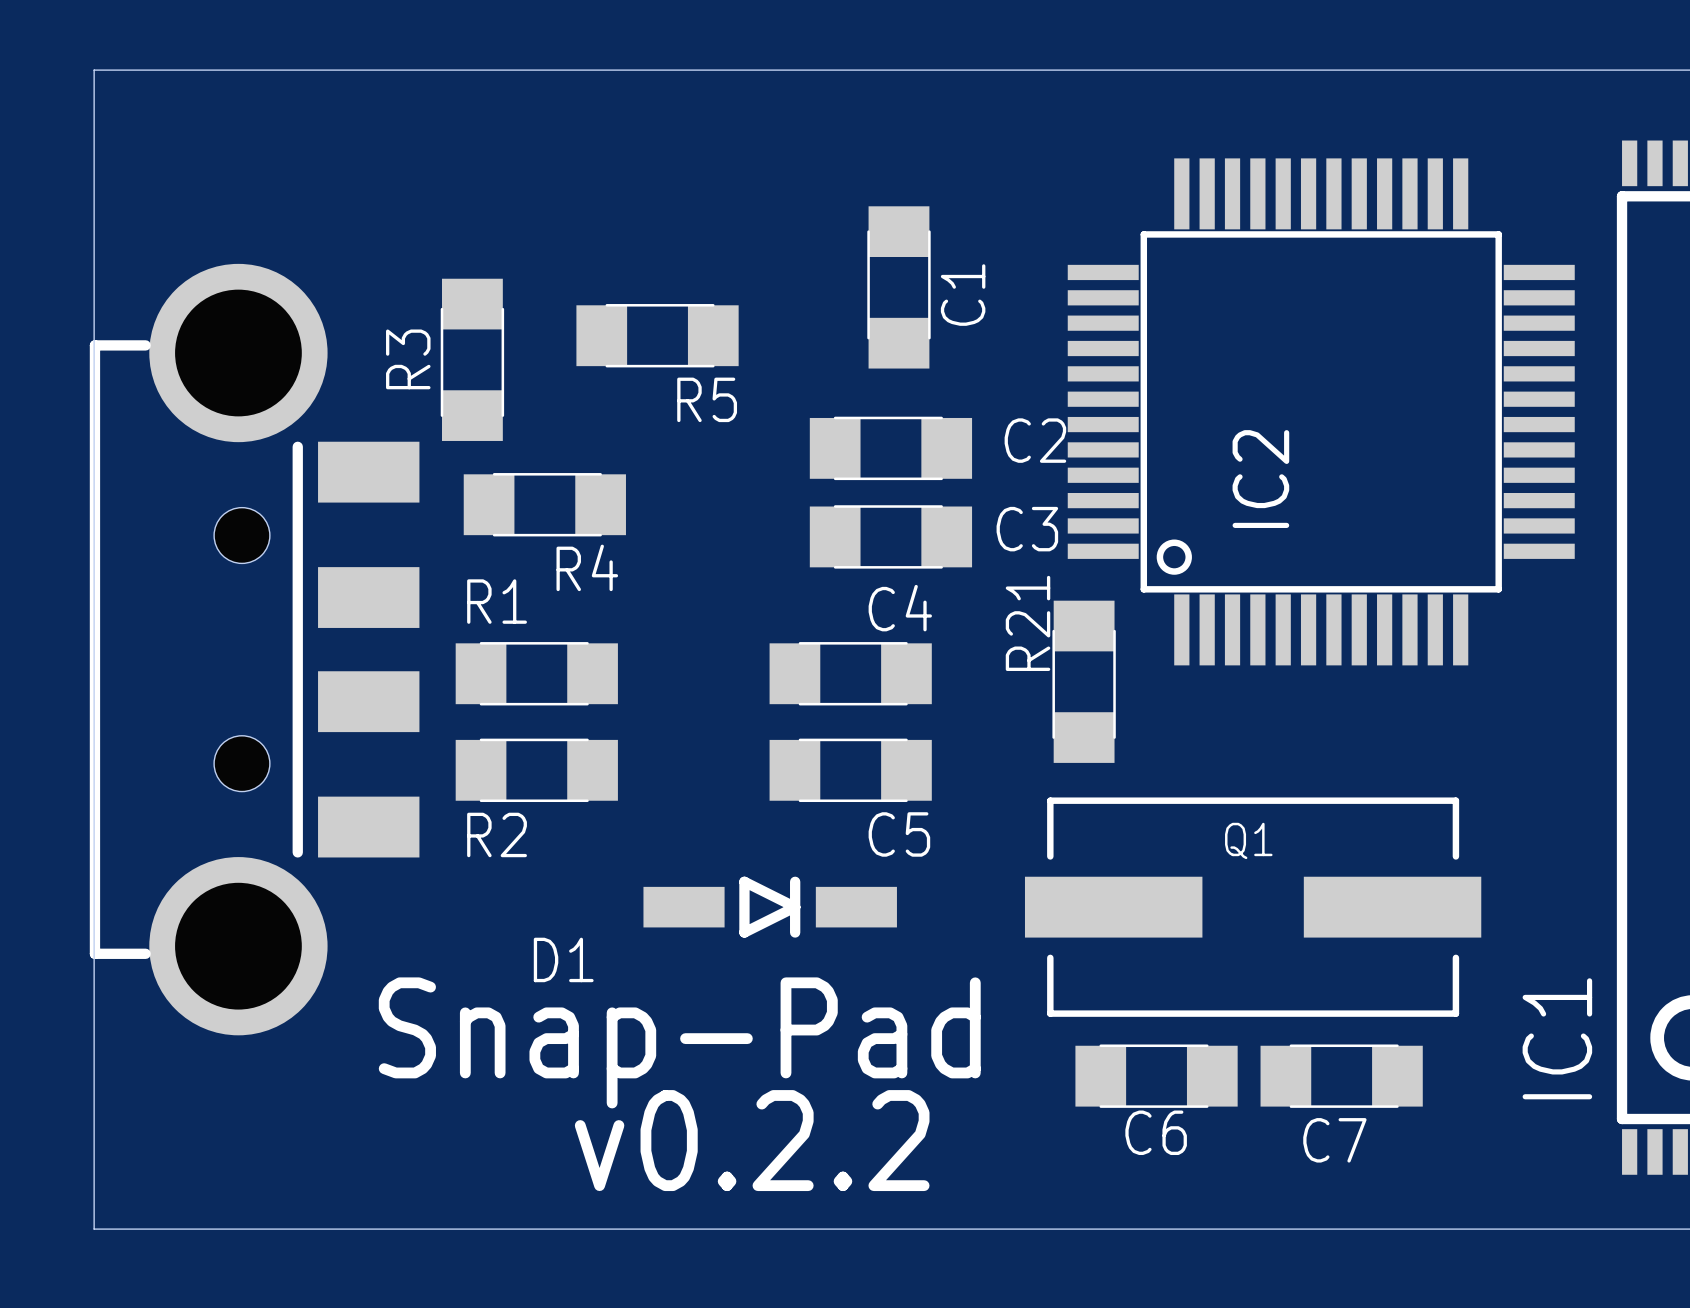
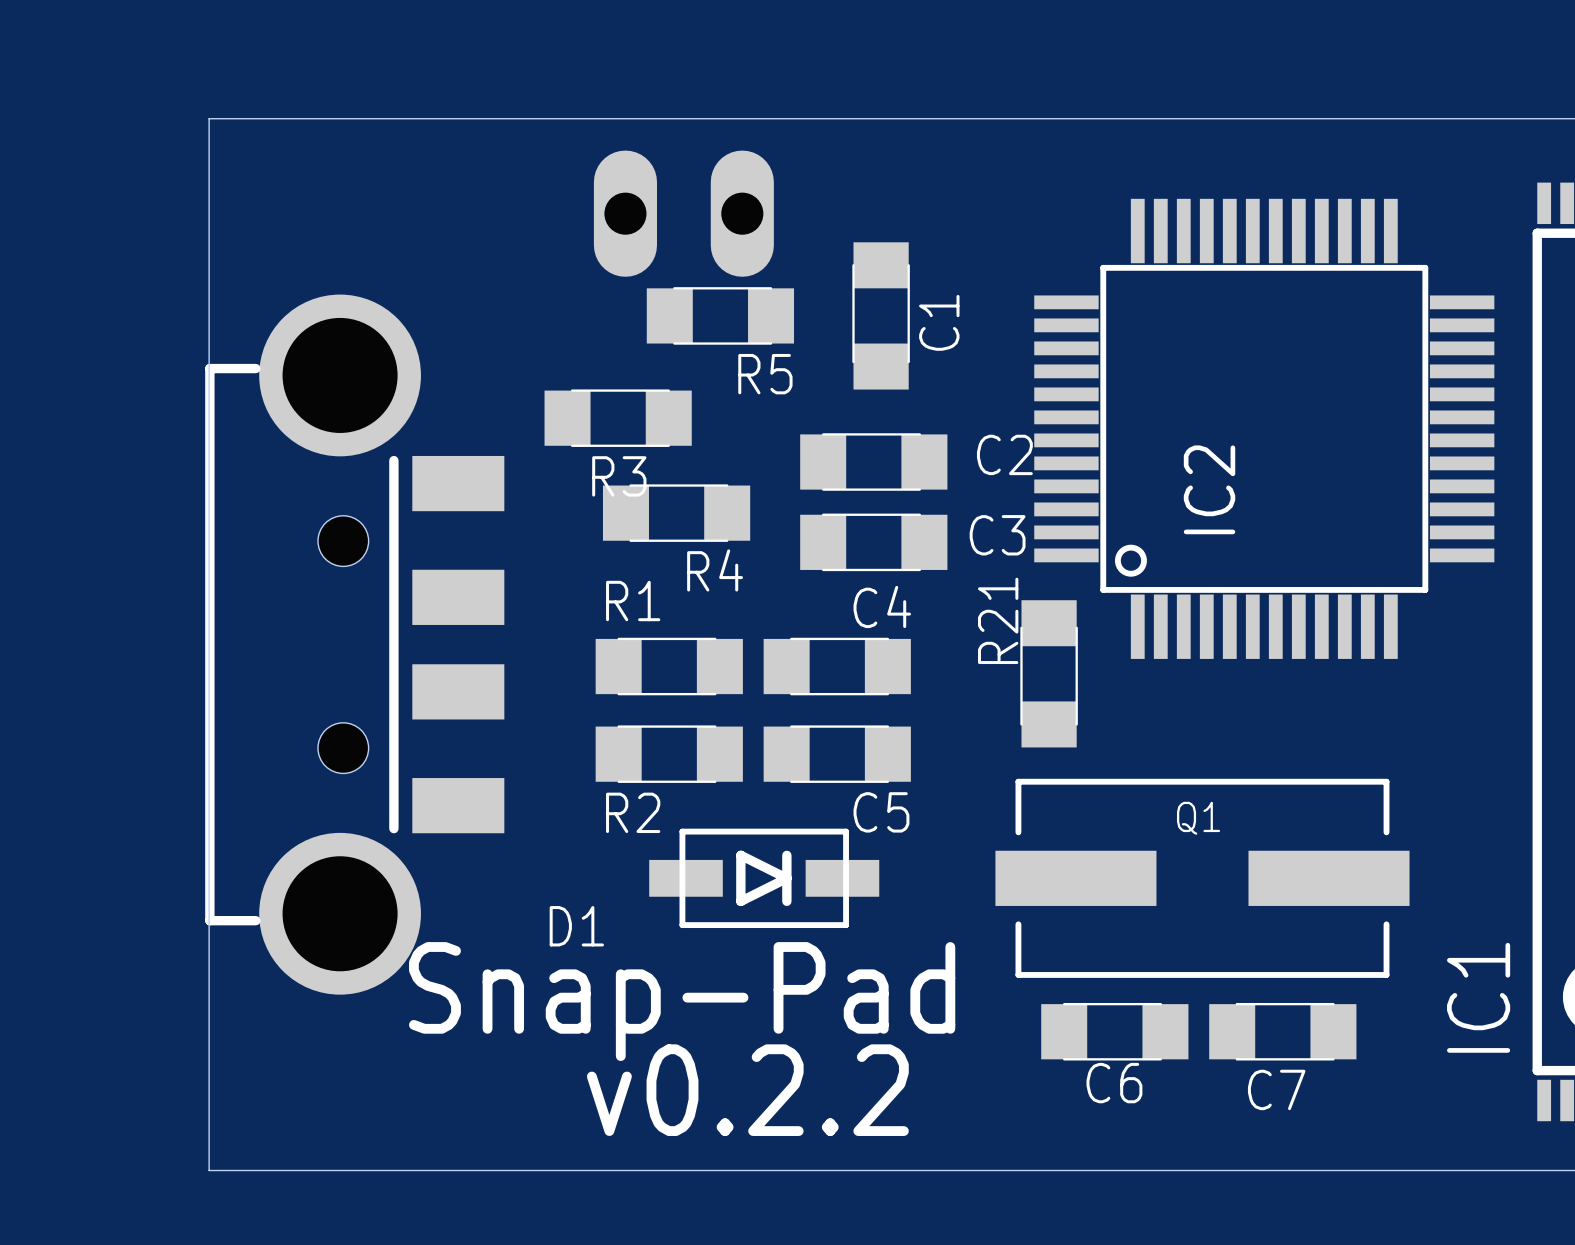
board edge: (158, 70) (94, 70) (94, 1229) (158, 1229) -> (209, 118) (209, 1170)
part: none -> (683, 213)
R5 position: (657, 335) -> (720, 315)
R3 rotation: 0° (472, 359) -> 90° counterclockwise (618, 418)
R3 position: (472, 359) -> (618, 418)
R4 position: (544, 504) -> (676, 513)
part position: (254, 649) -> (354, 644)
R1 position: (536, 673) -> (669, 666)
R2 position: (536, 770) -> (669, 754)
D1 footprint: [643, 876, 897, 938] -> [649, 828, 880, 929]

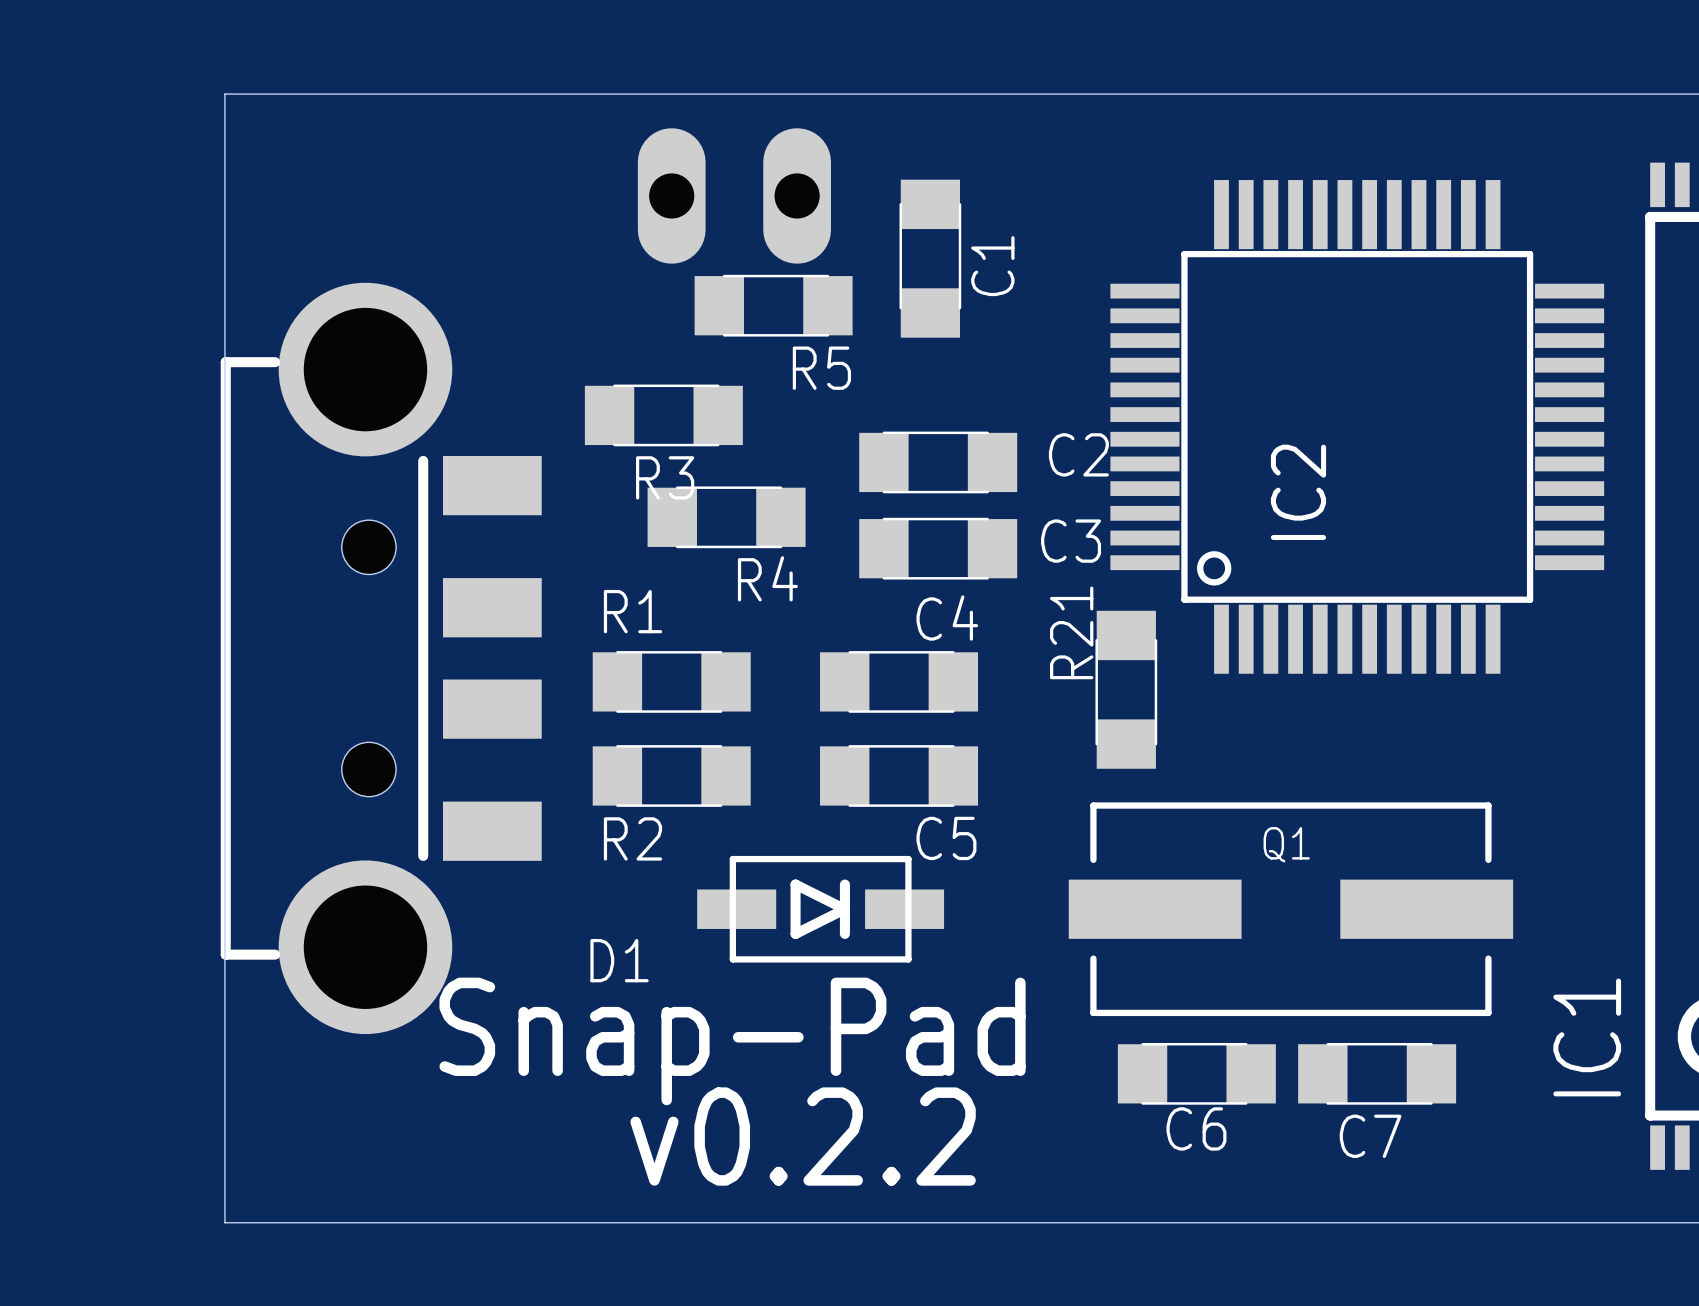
C1 position: (881, 315) -> (930, 258)
R1 position: (669, 666) -> (671, 681)
R2 position: (669, 754) -> (671, 775)

